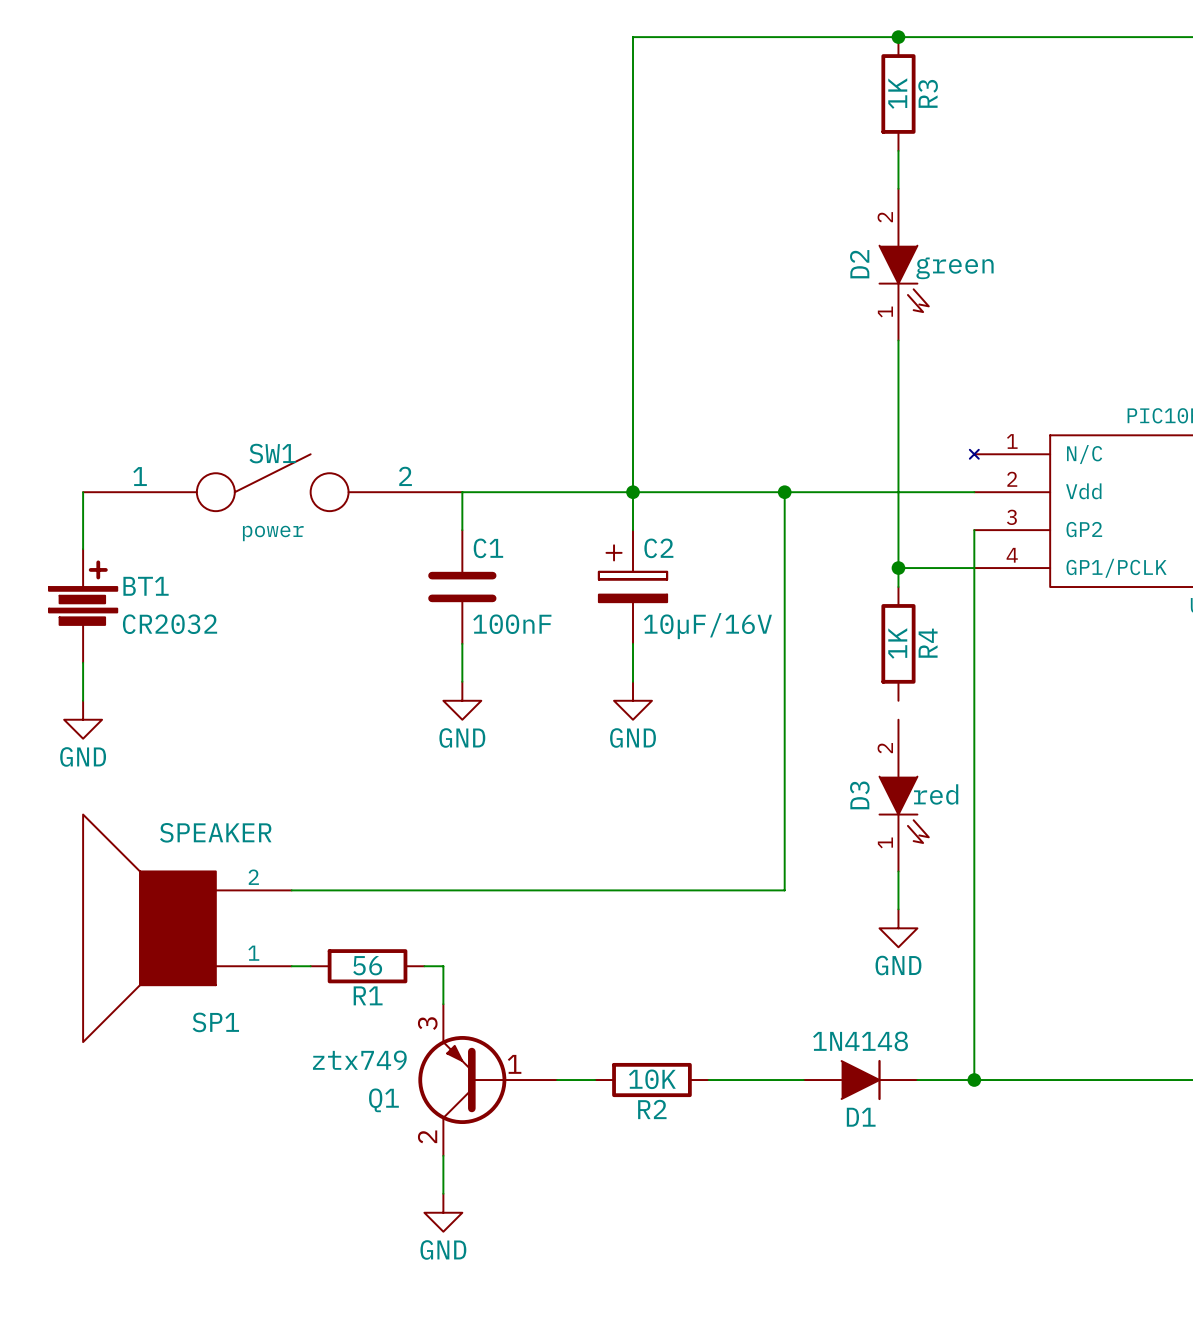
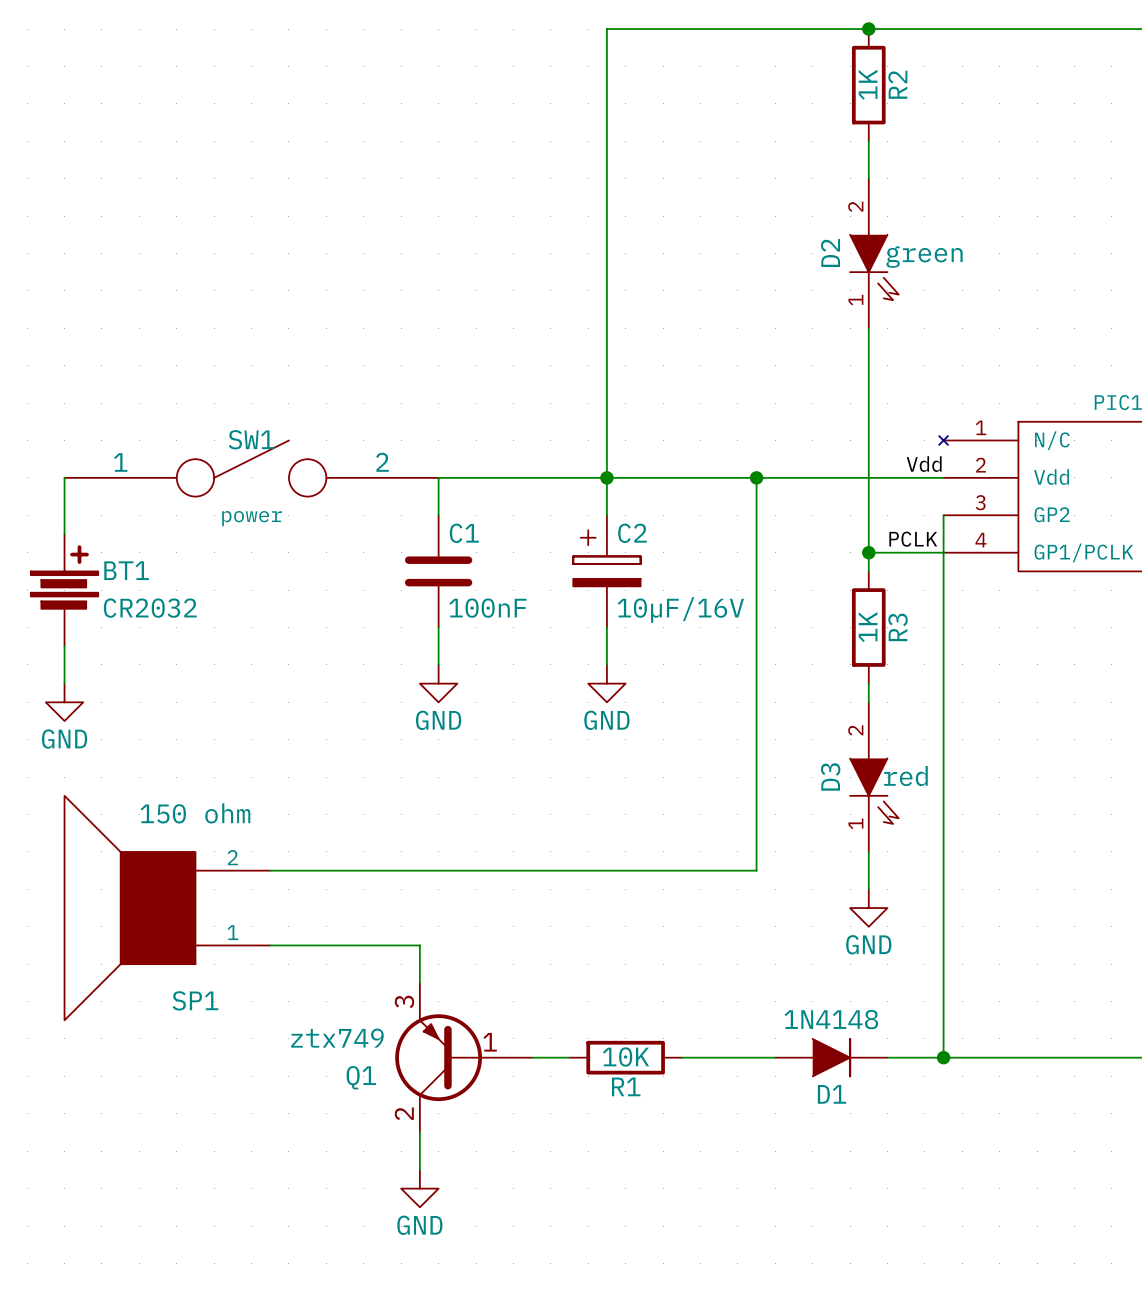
R3 name: R3 (928, 93) -> R2 (897, 84)
label: none -> Vdd (924, 464)
label: none -> PCLK (913, 539)
R4 name: R4 (928, 643) -> R3 (898, 627)
wire: none -> (868, 683) (868, 702)
SP1 value: SPEAKER (215, 832) -> 150 ohm (195, 813)
wire: none -> (288, 945) (401, 945)
R1: 56 (367, 966) -> none
R2 name: R2 (652, 1109) -> R1 (626, 1086)

